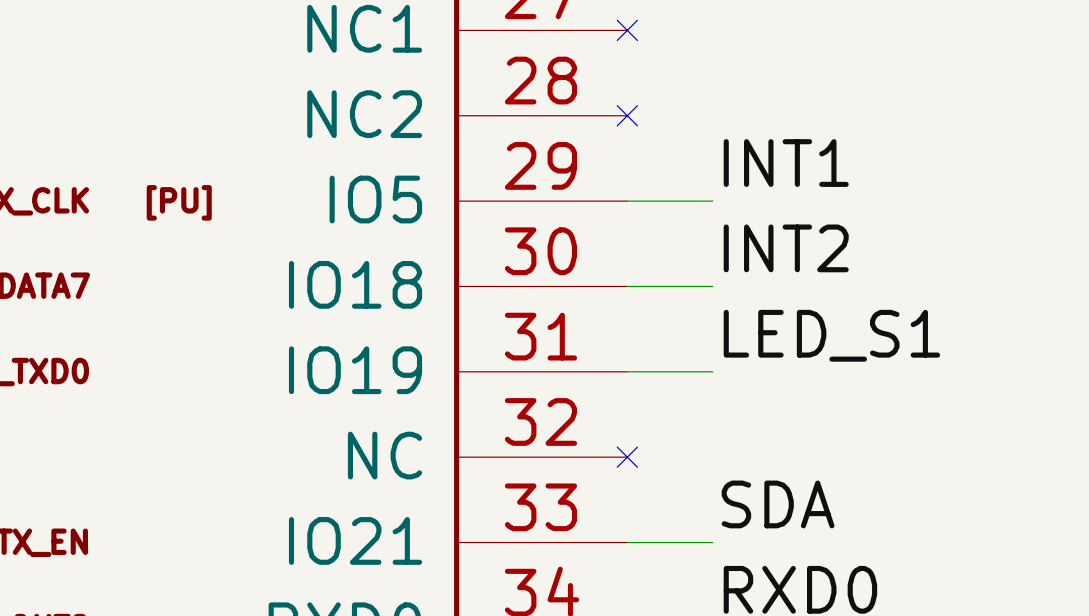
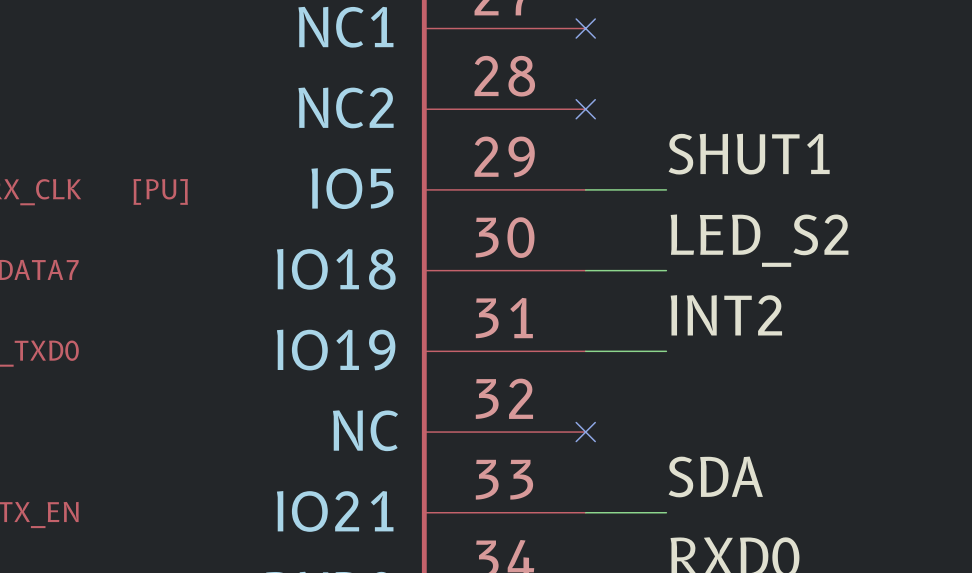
label: INT1 (786, 163) -> SHUT1 (749, 154)
label: INT2 (786, 248) -> LED_S2 (759, 240)
label: LED_S1 (831, 335) -> INT2 (726, 315)

